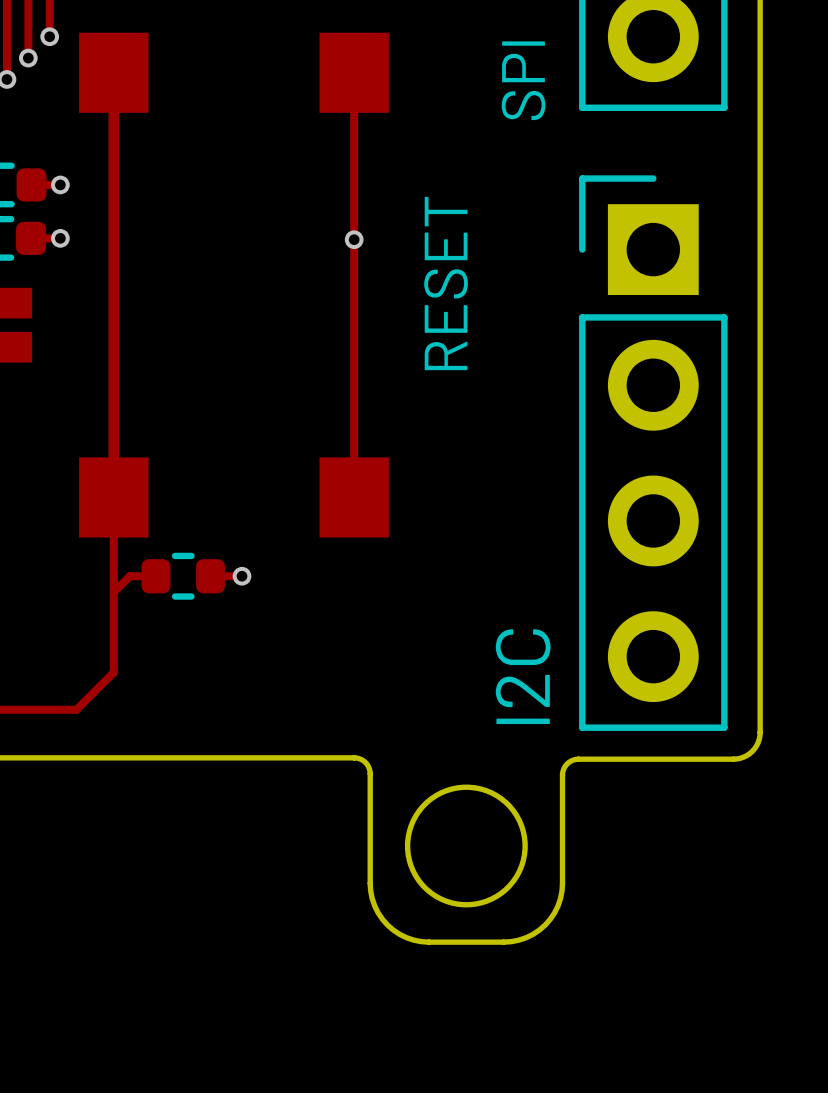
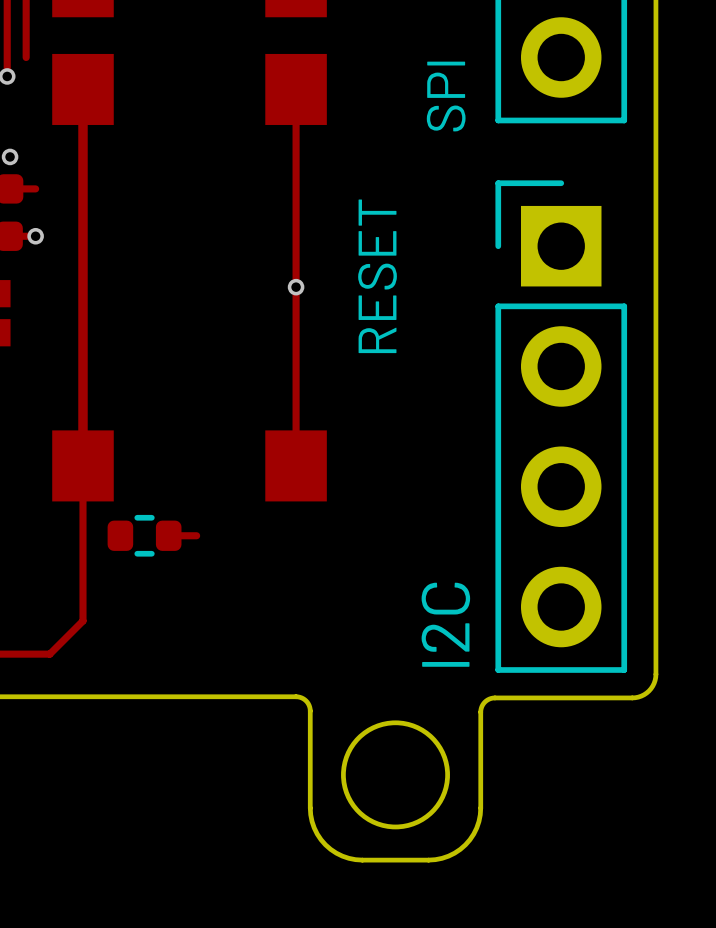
via: (49, 36) -> none
via position: (60, 184) -> (10, 156)
via position: (354, 239) -> (296, 287)
track: (156, 576) (129, 576) (113, 592) -> none
via: (242, 576) -> none

